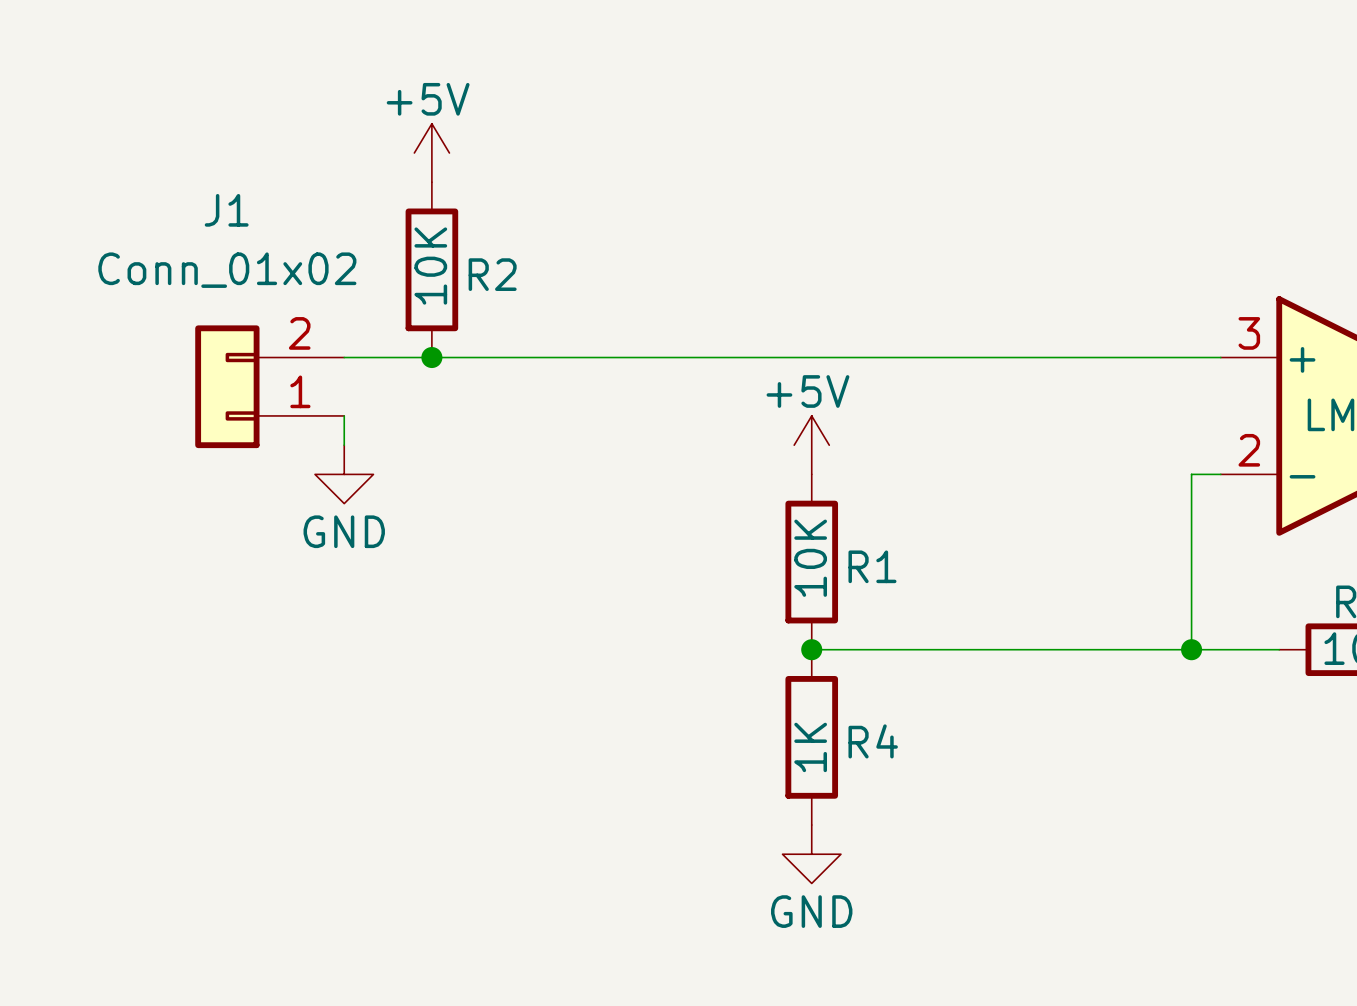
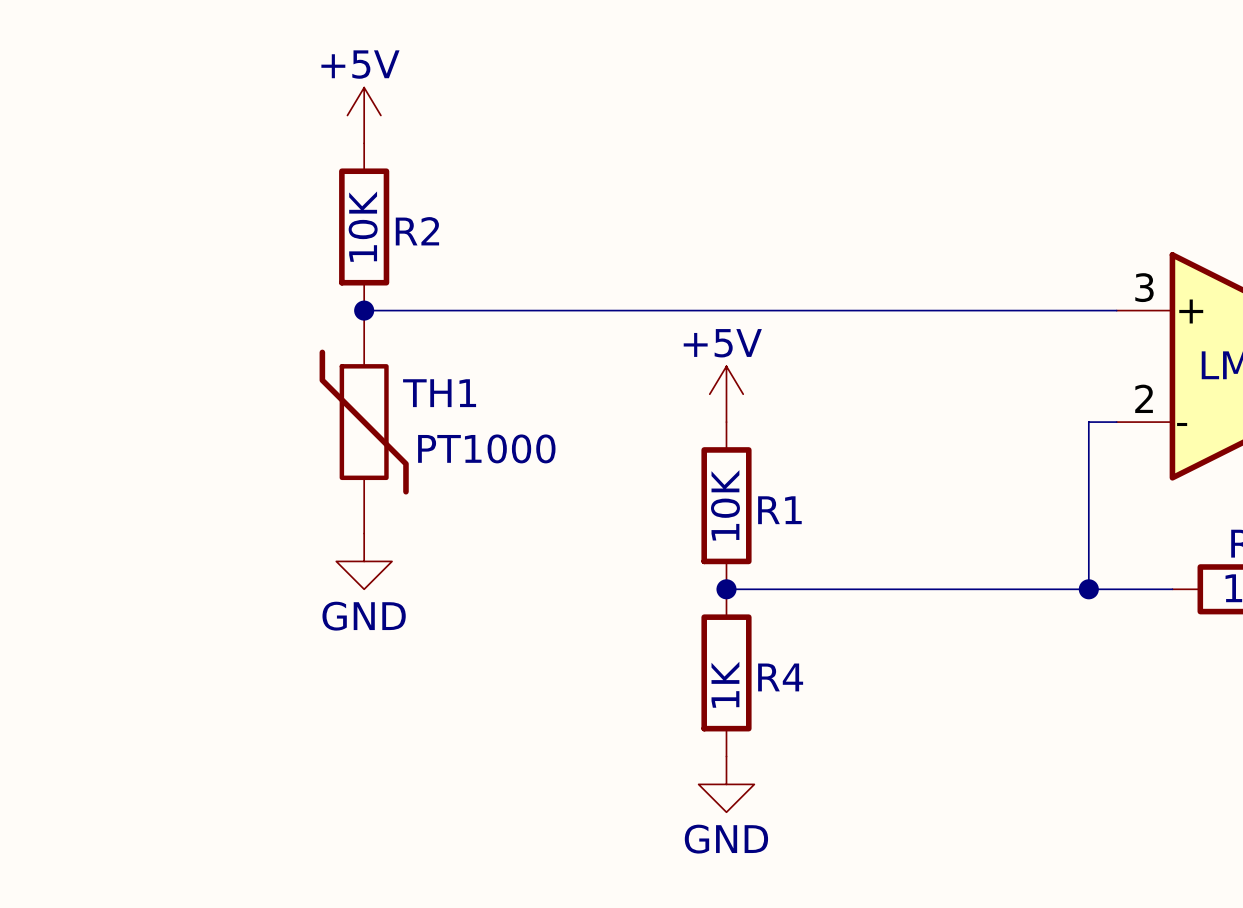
wire: (344, 357) (431, 357) -> none
J1: Conn_01x02 (269, 386) -> none
wire: (344, 415) (344, 445) -> none
power symbol position: GND (344, 474) -> GND (364, 561)
TH1: none -> PT1000 (364, 422)

